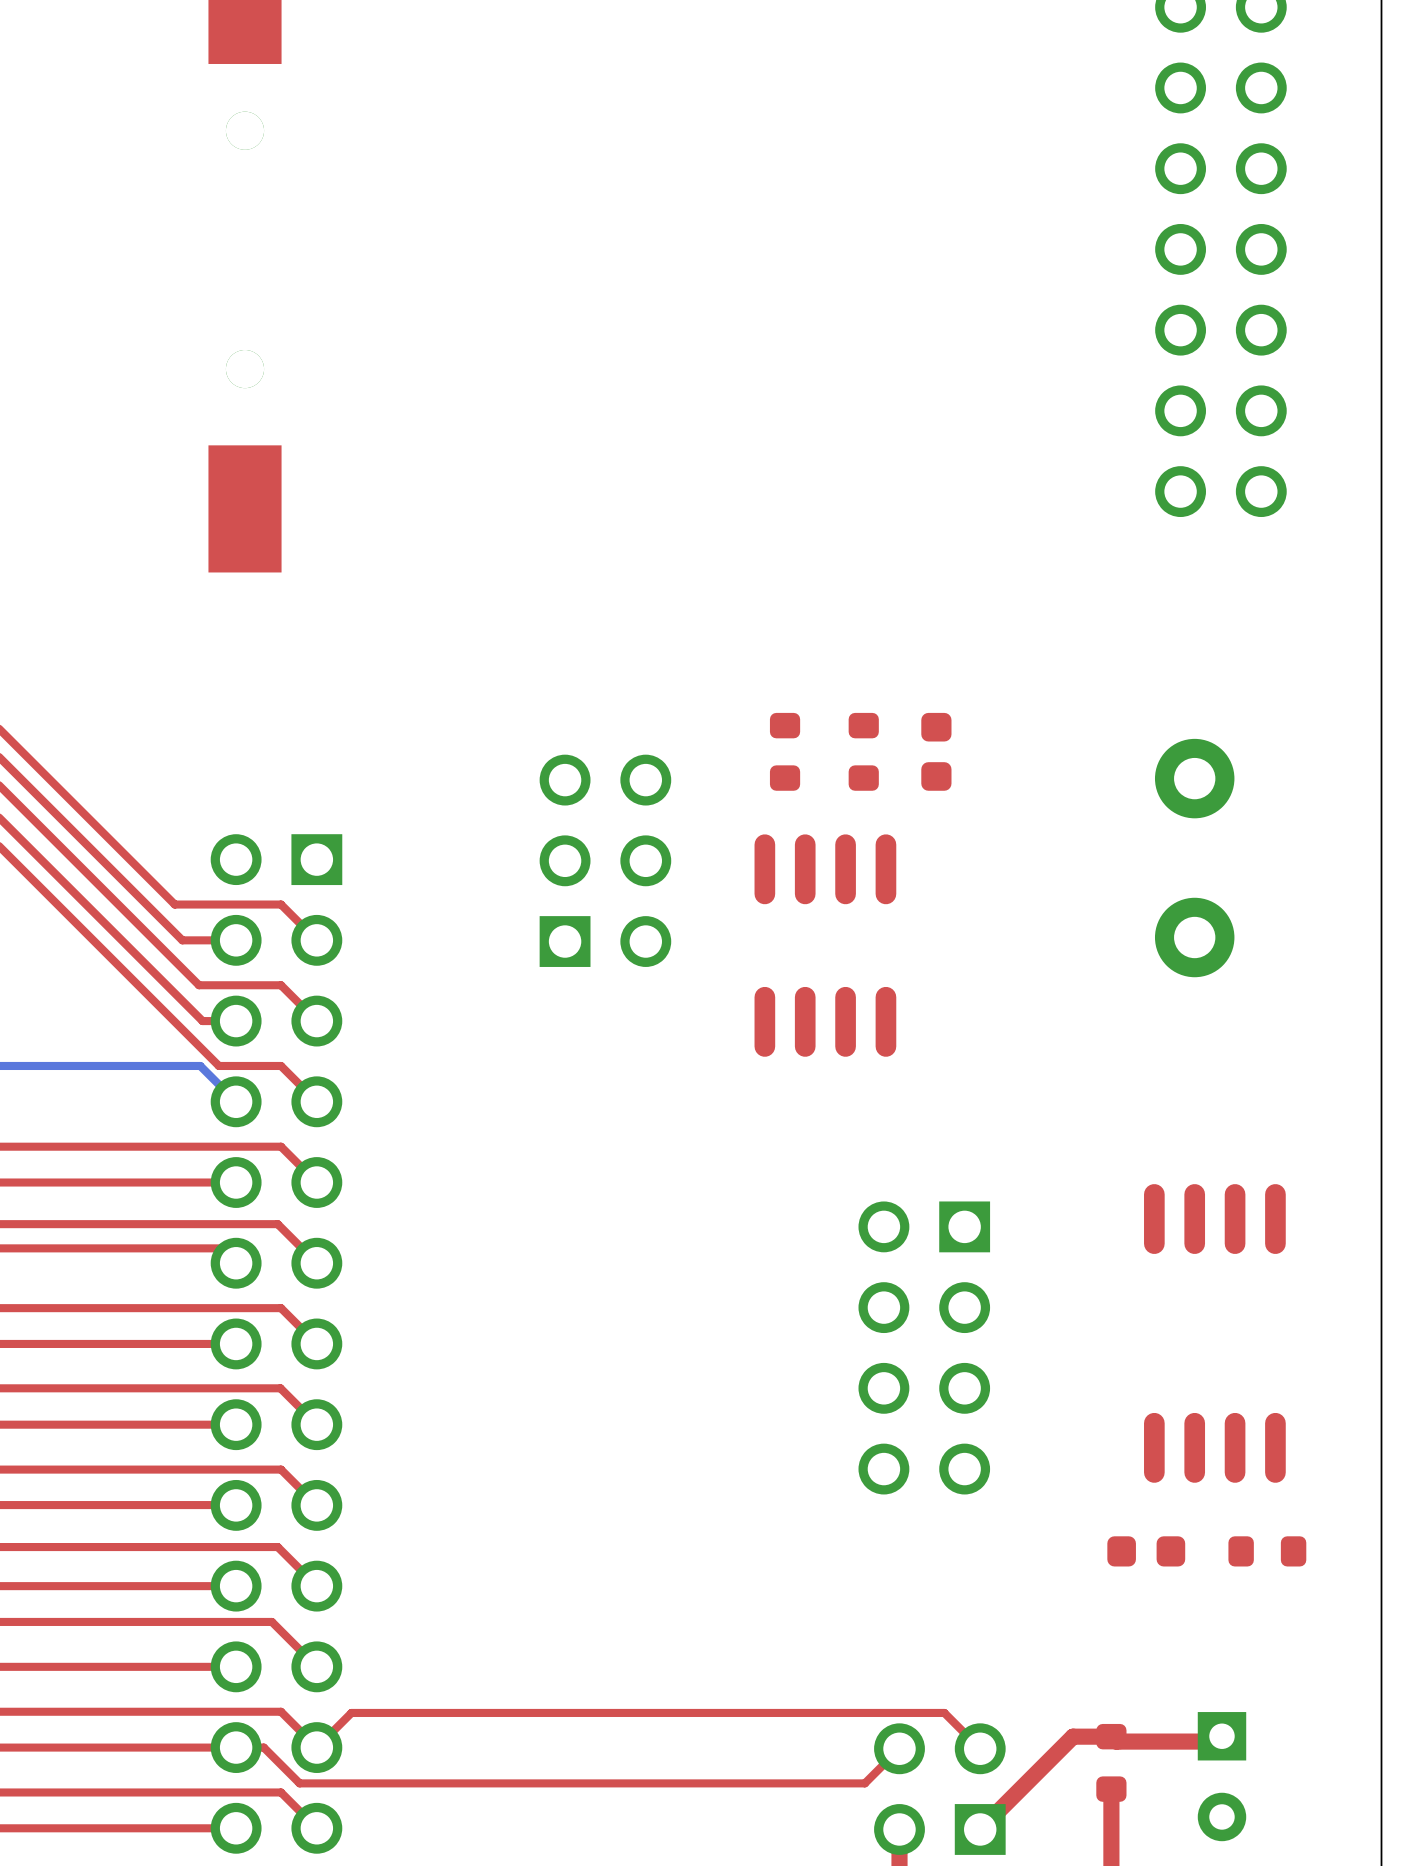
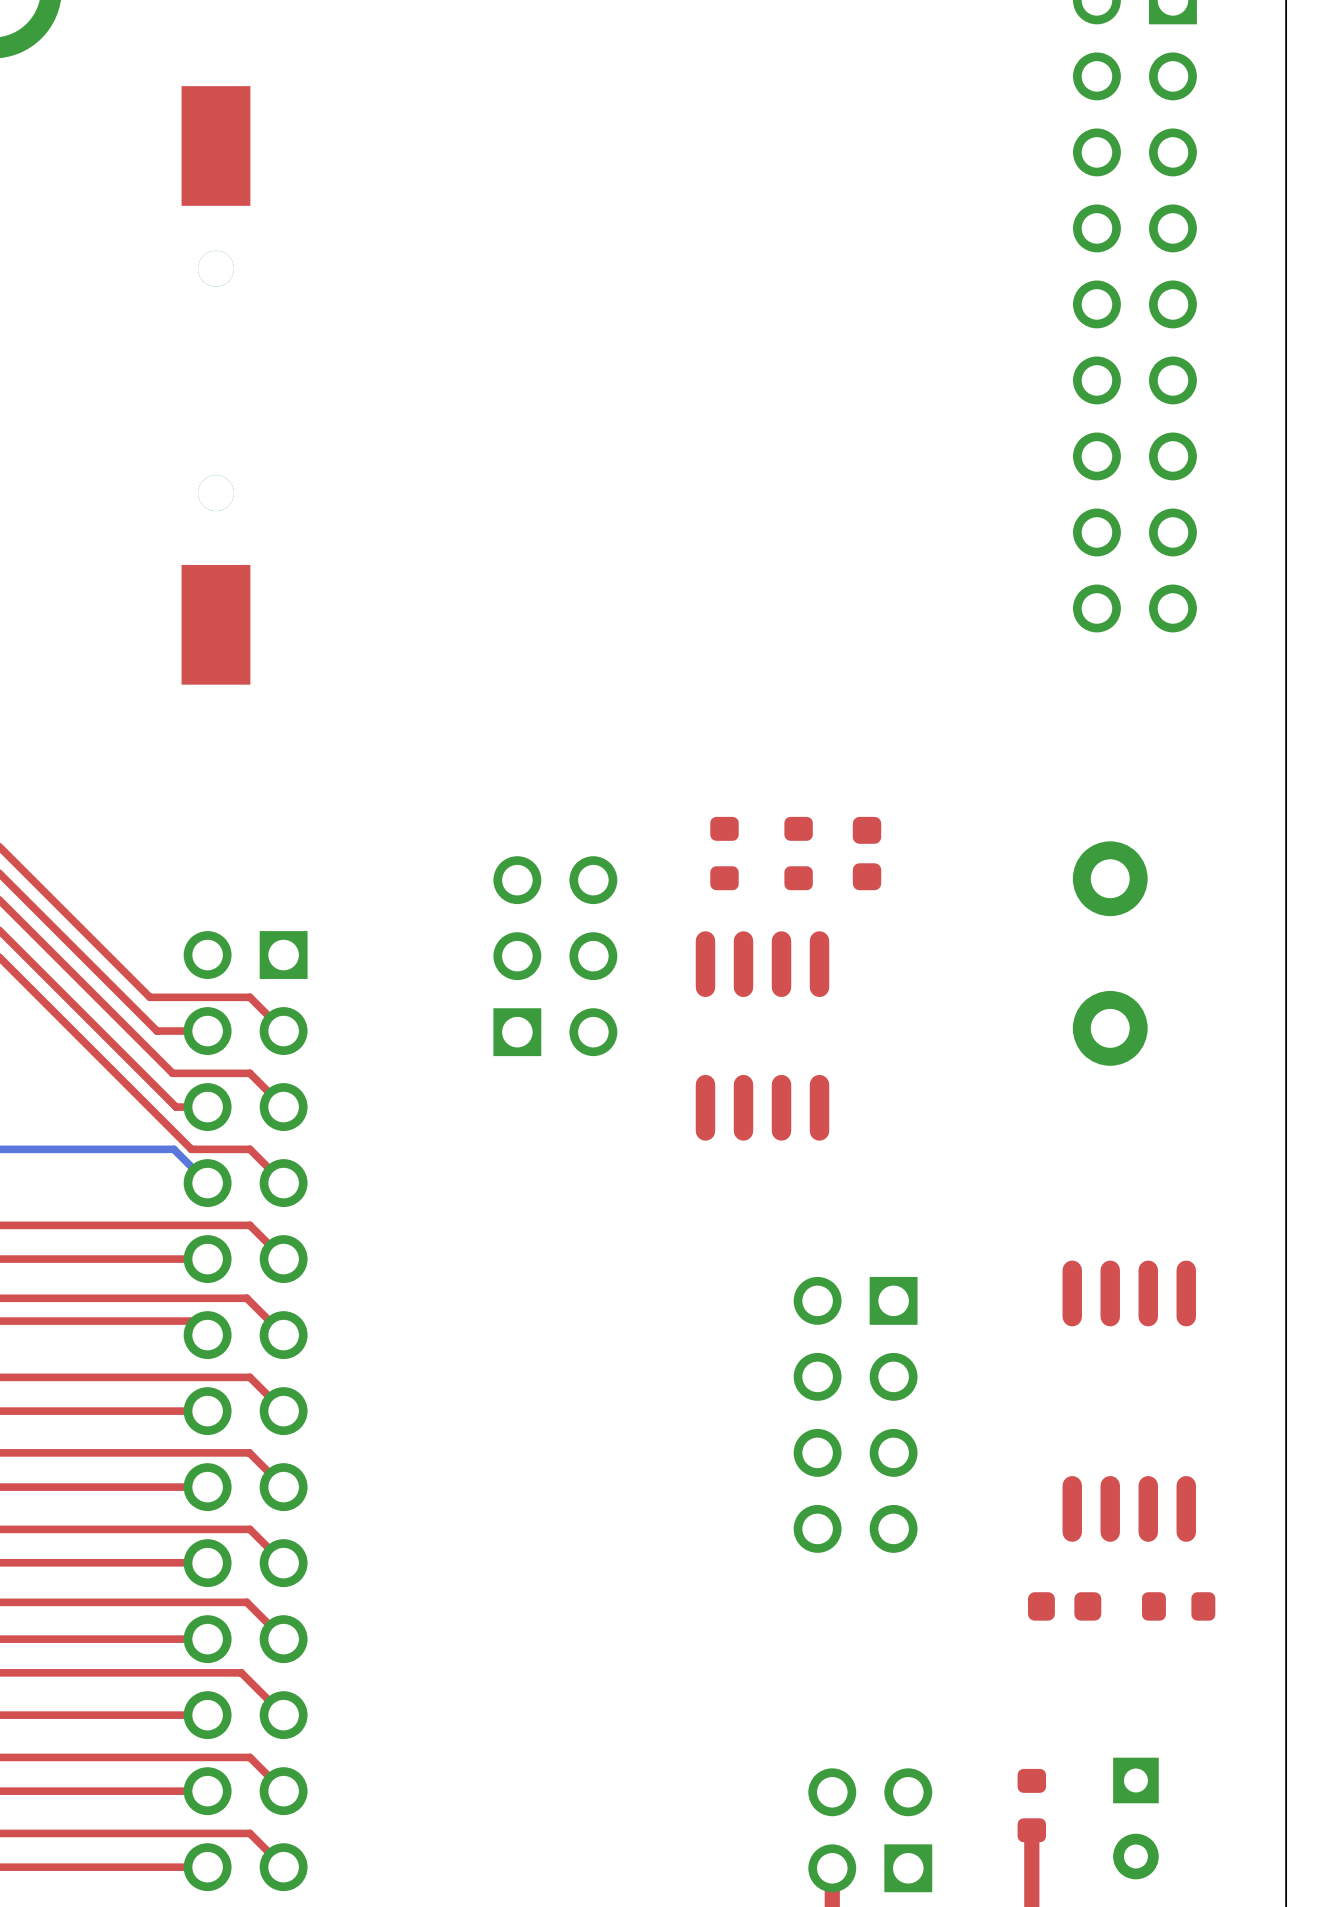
top track: (1221, 1736) (1221, 1741) (1116, 1741) (1111, 1736) (1073, 1736) (980, 1829) -> none
top track: (236, 1747) (263, 1747) (299, 1783) (864, 1783) (899, 1748) -> none
top track: (316, 1747) (351, 1712) (944, 1712) (980, 1748) -> none

